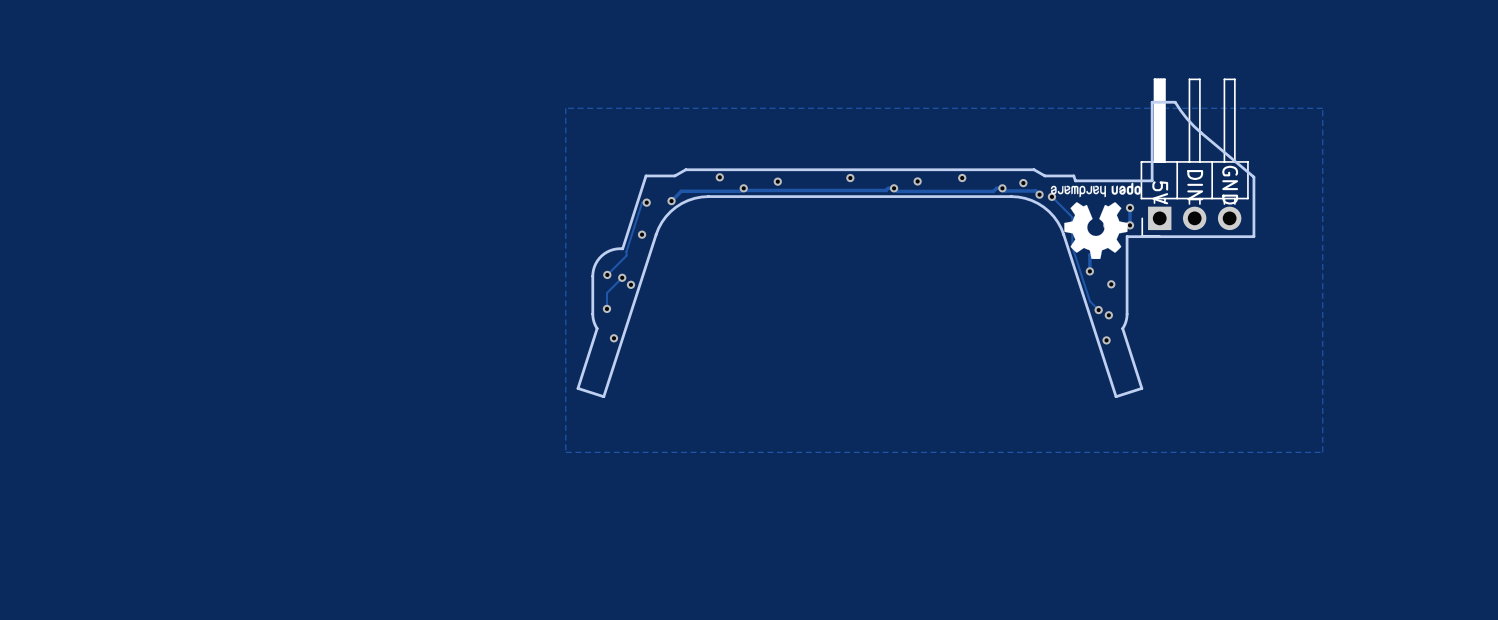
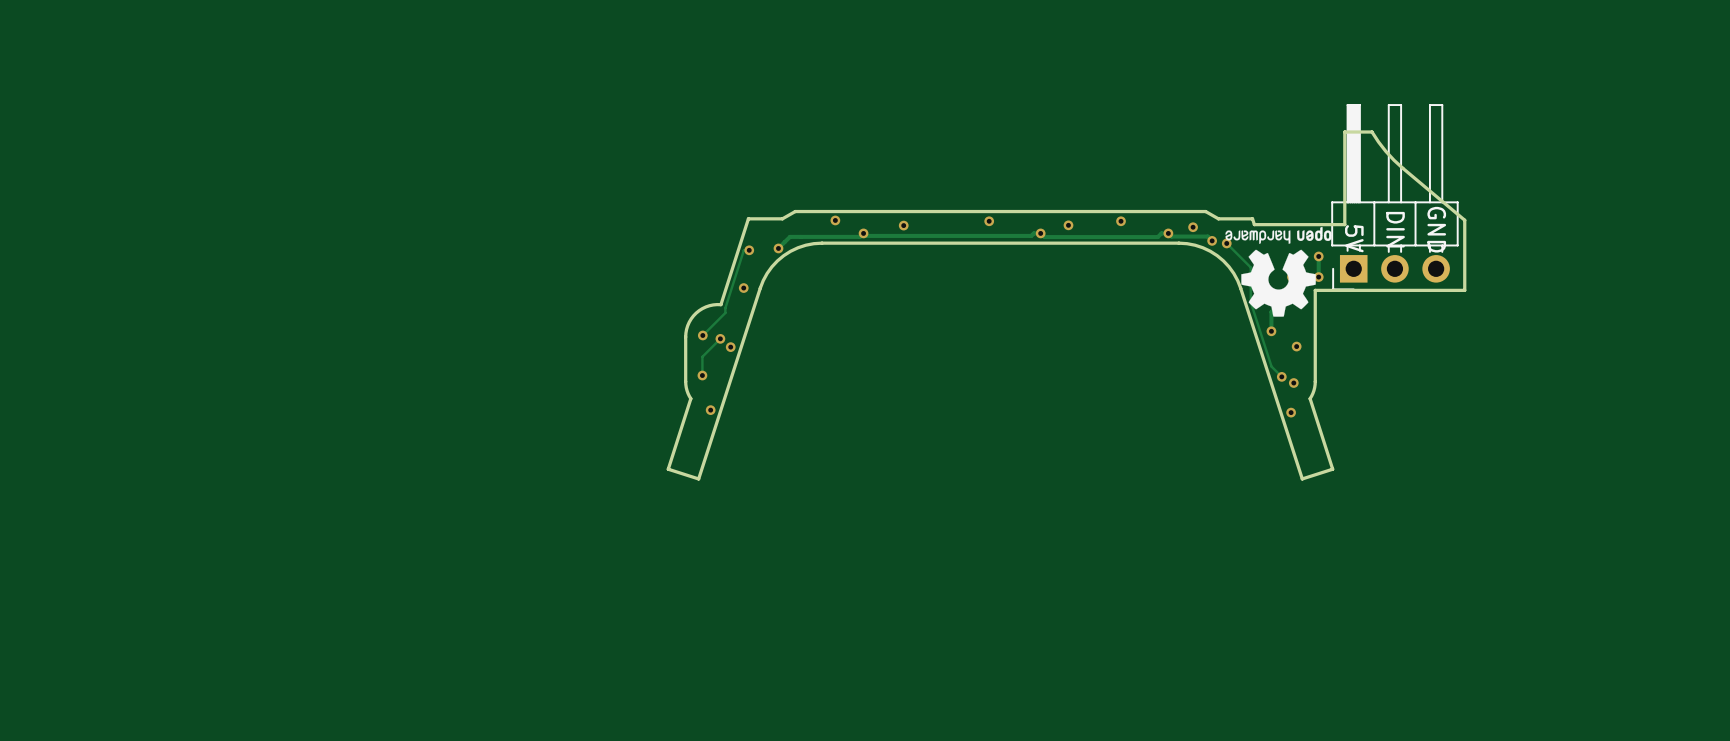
zone outline: (1322, 108) (1322, 452) (565, 452) (565, 108) (1322, 108) -> none

